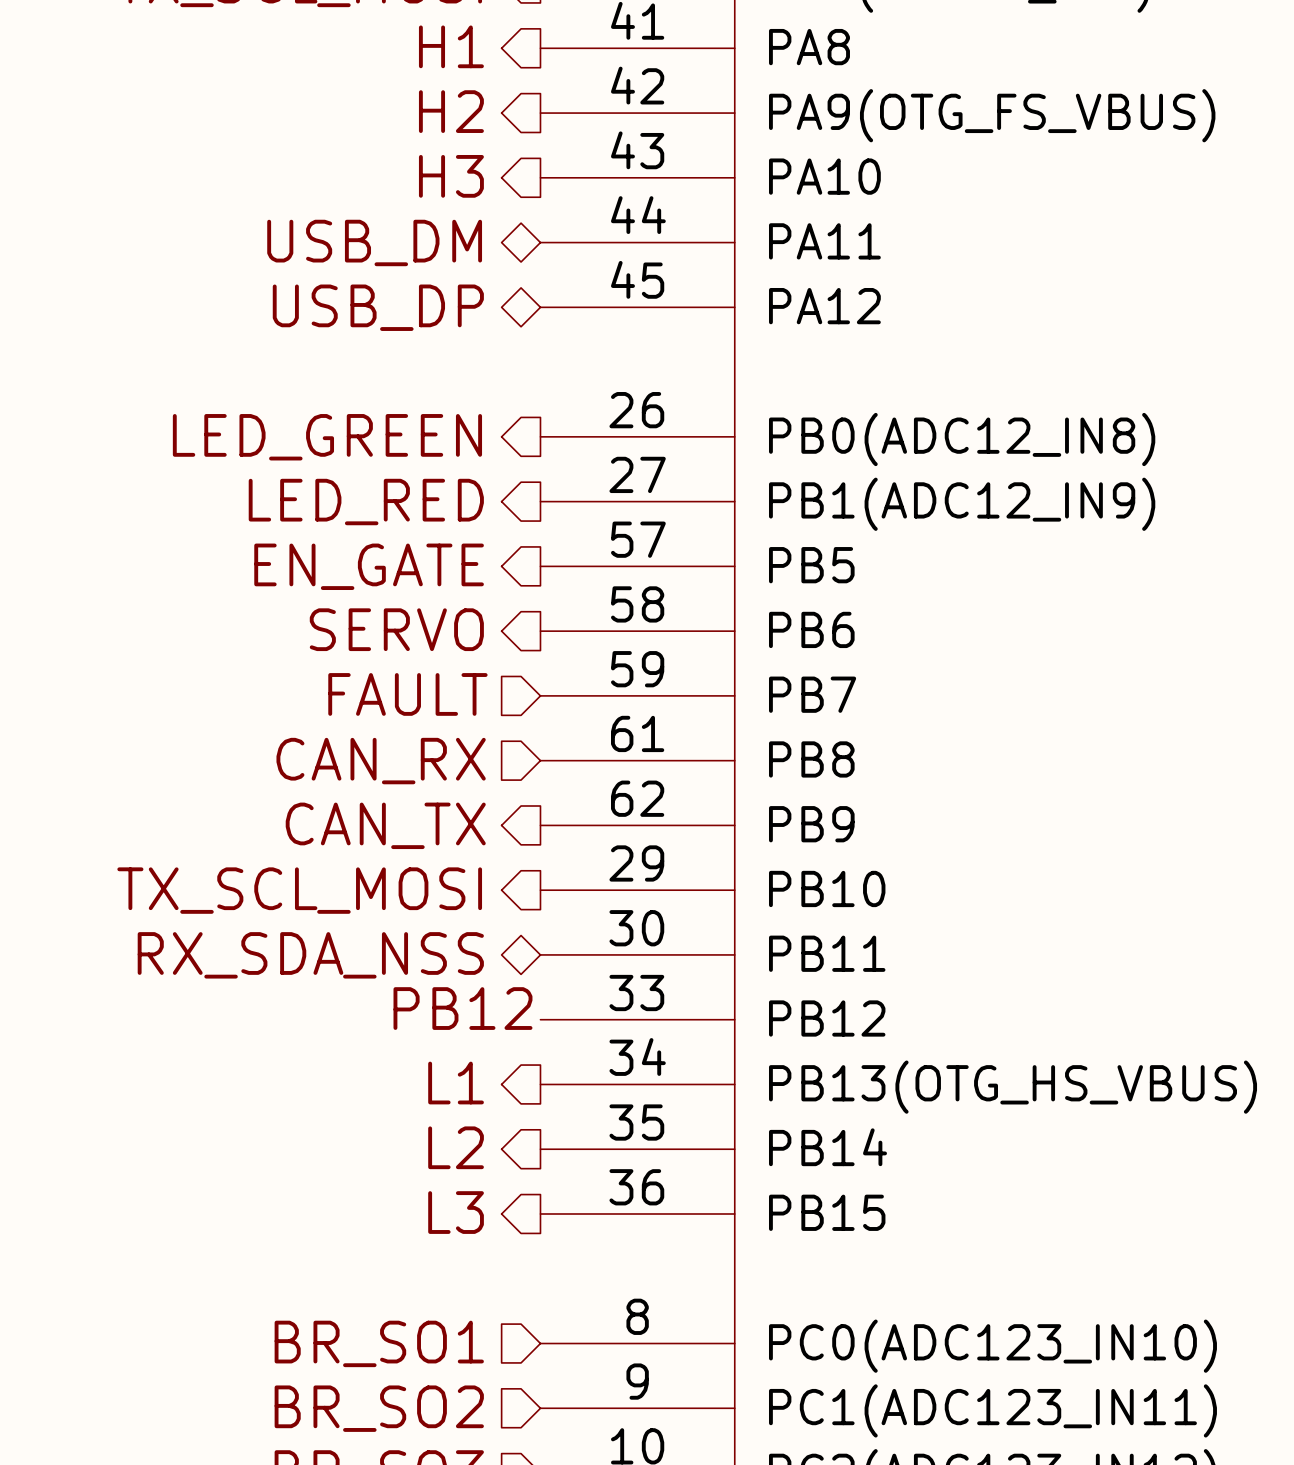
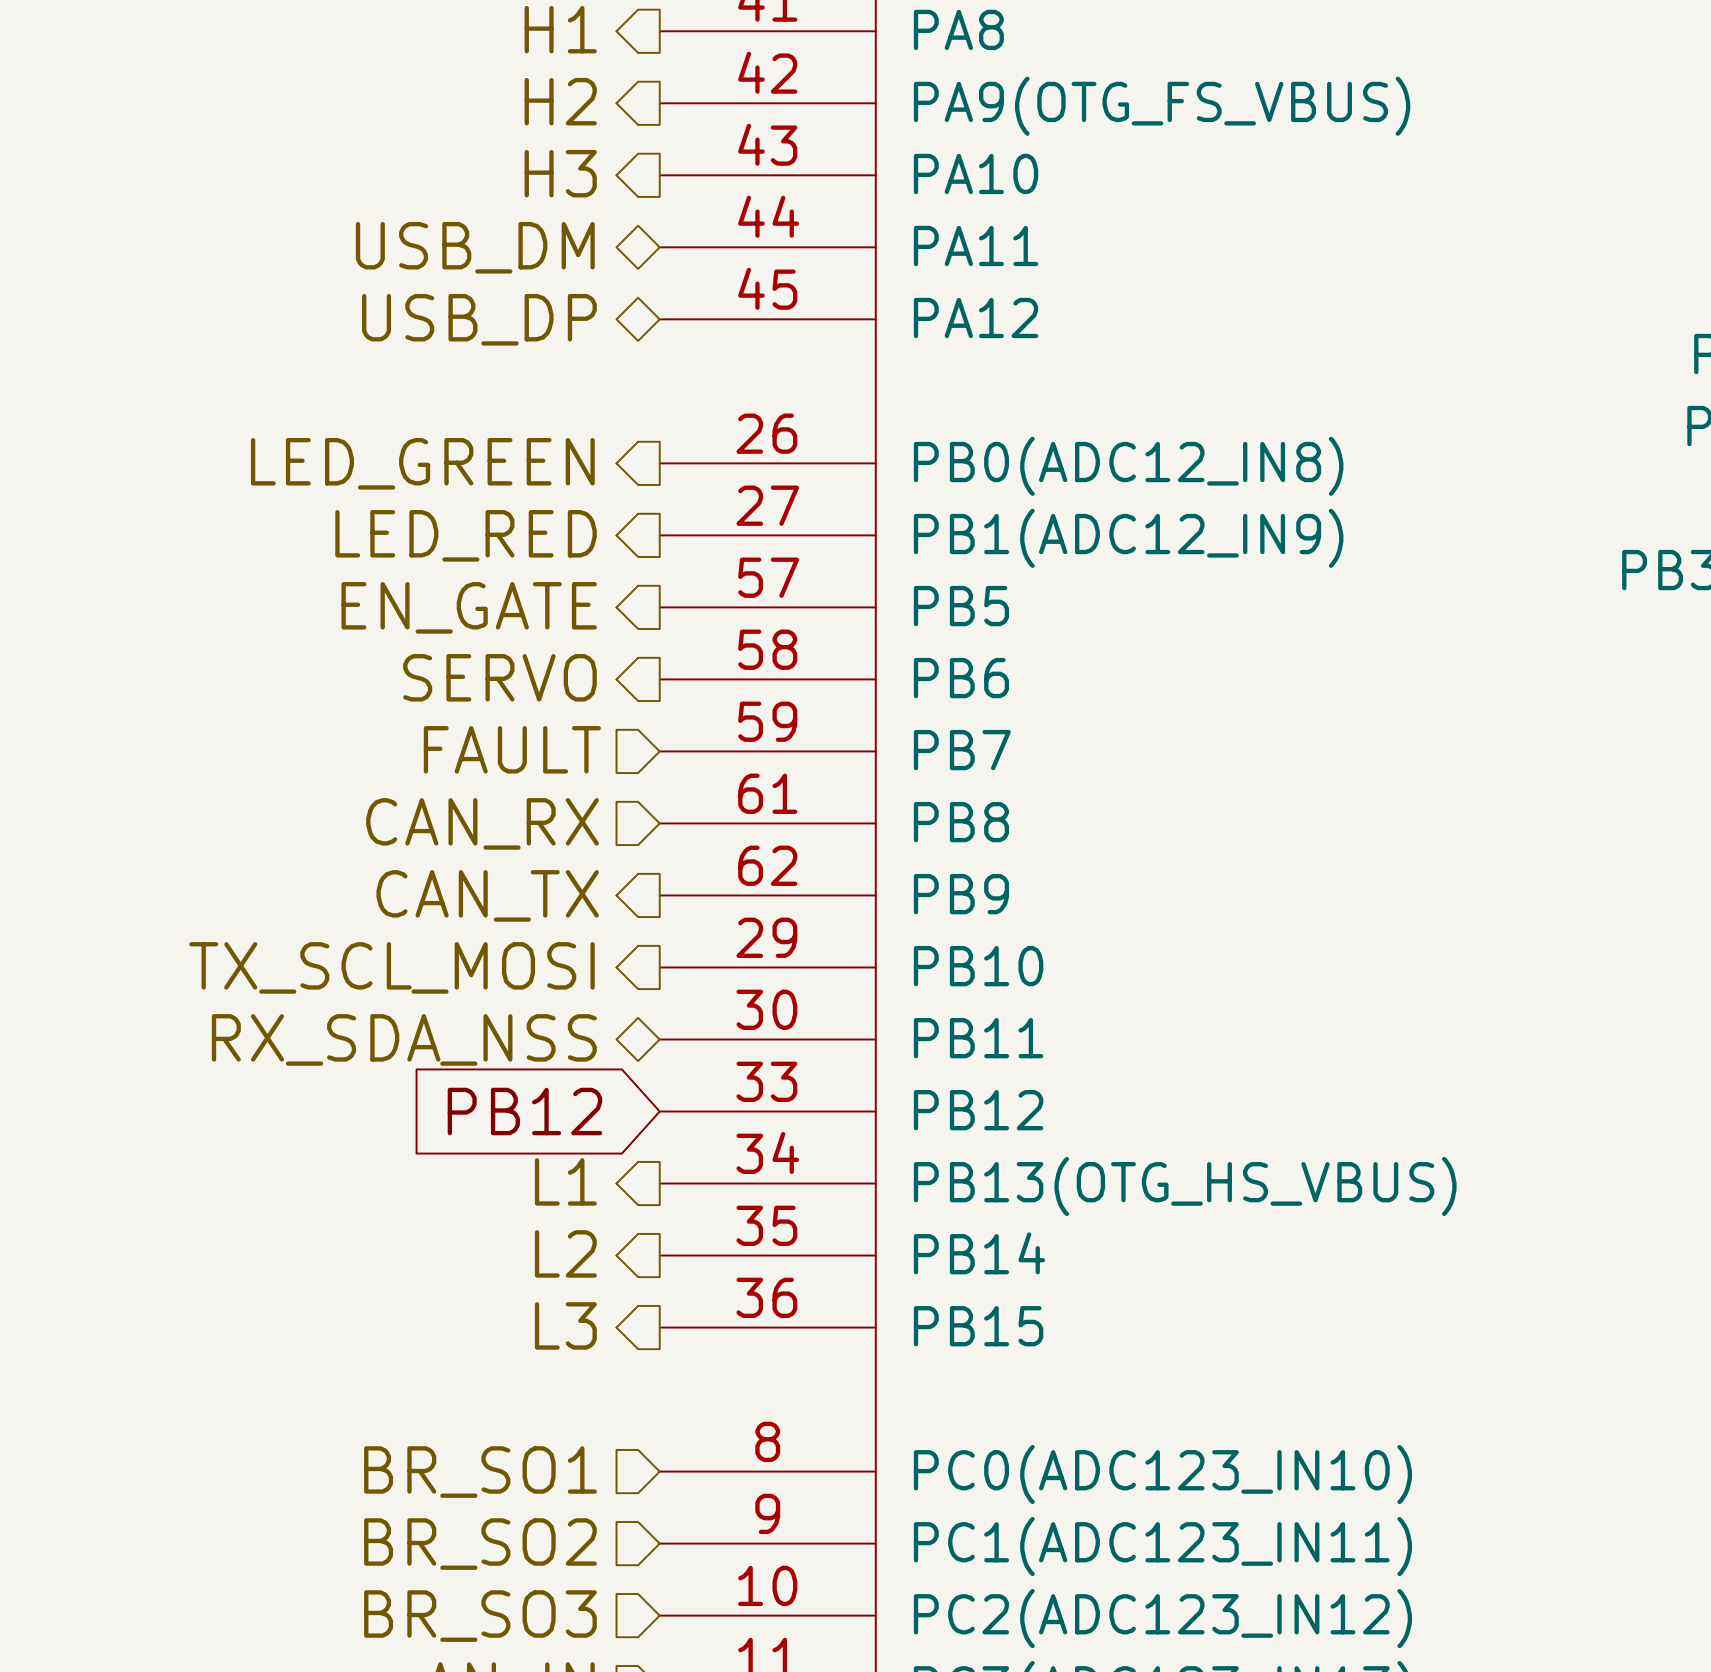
label: PB12 (462, 1008) -> none
global label: none -> PB12 (524, 1111)

